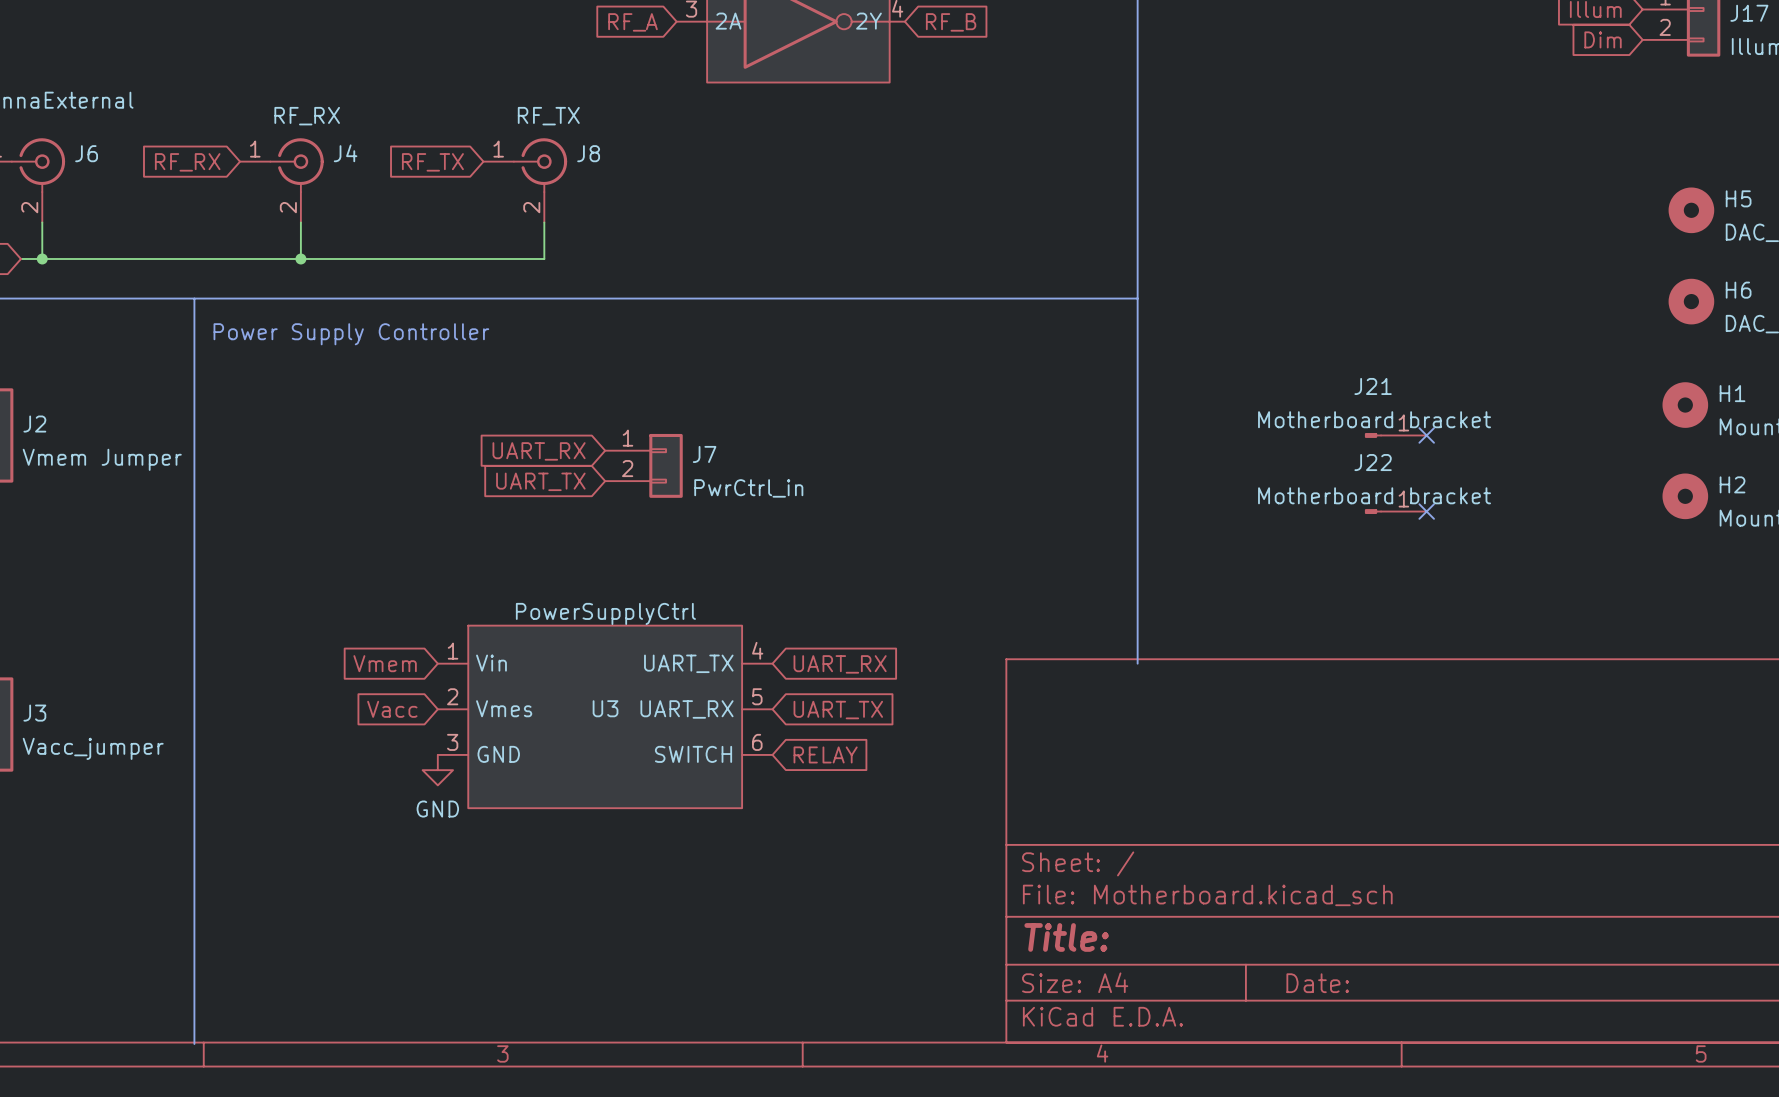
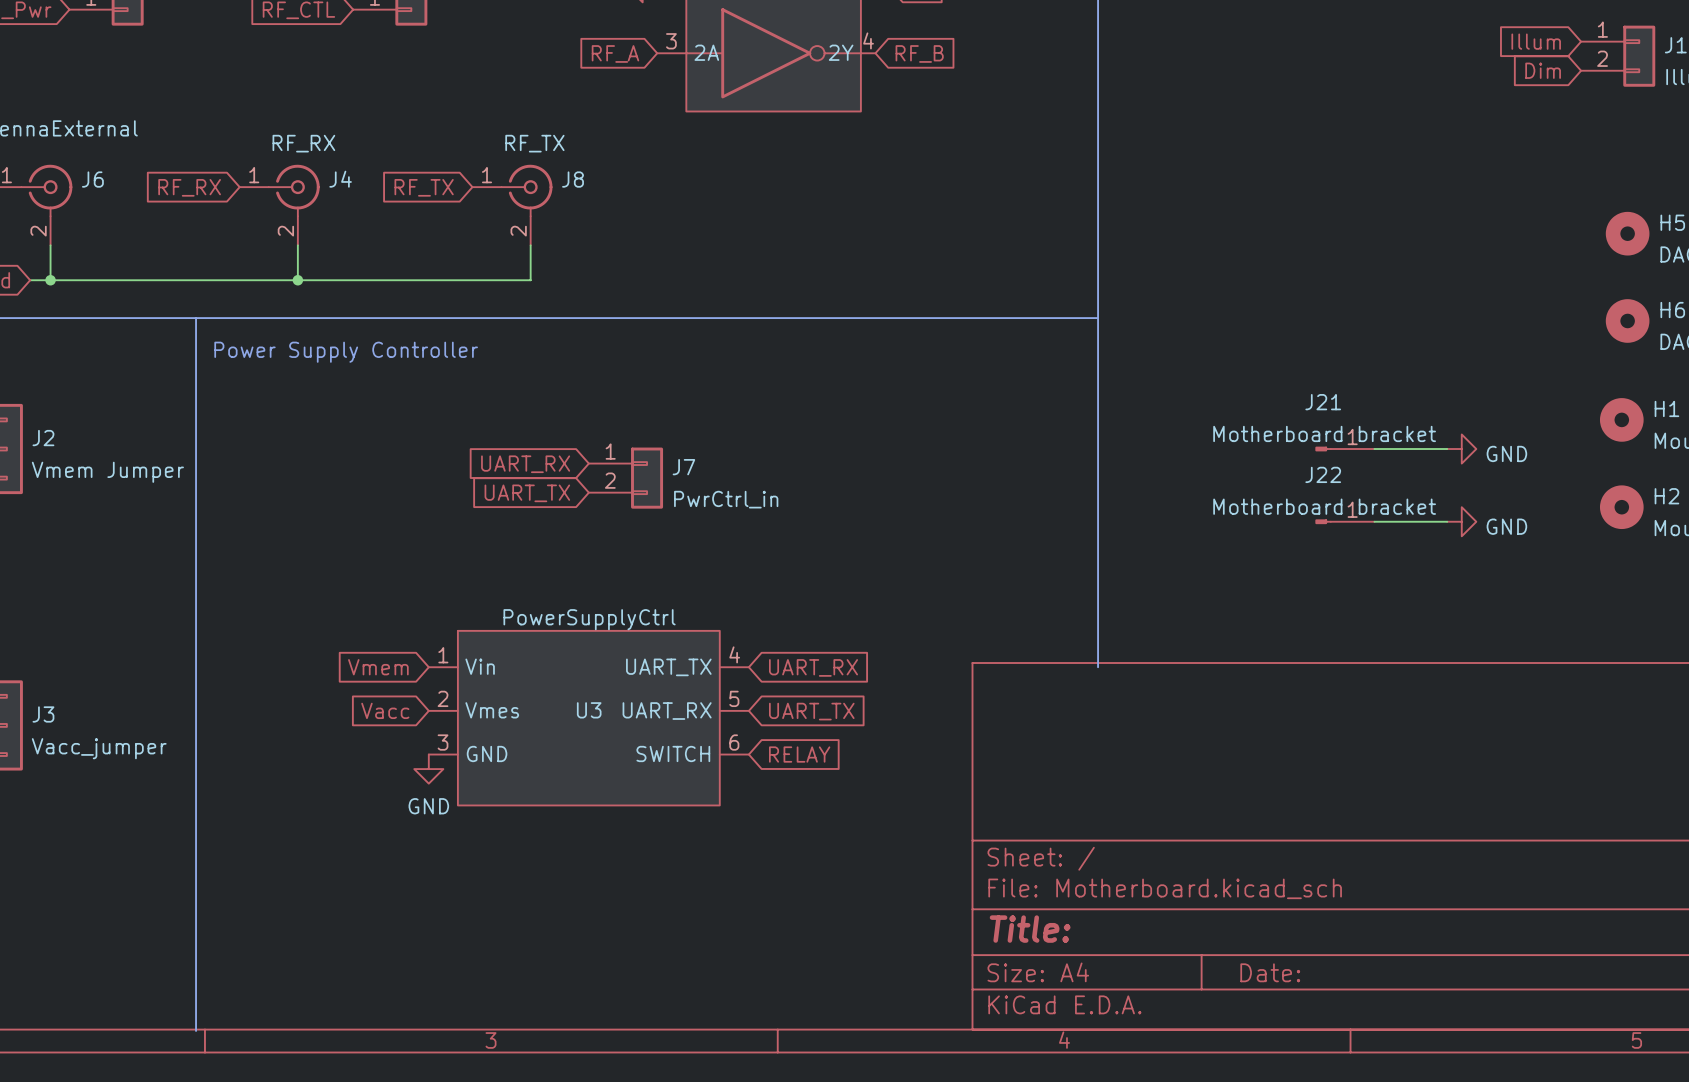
wire: none -> (1374, 449) (1447, 449)
no-connect mark: (1426, 435) -> none
power symbol: none -> GND (1461, 449)
wire: none -> (1374, 521) (1447, 521)
no-connect mark: (1426, 511) -> none
power symbol: none -> GND (1461, 521)

